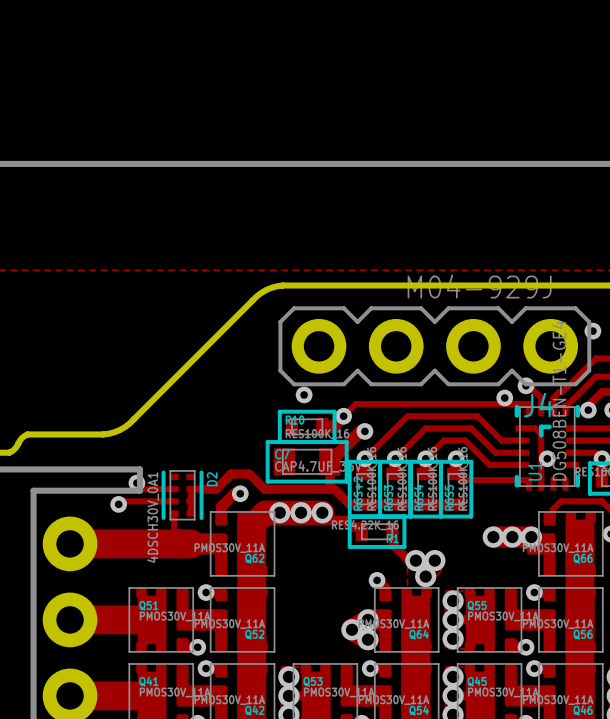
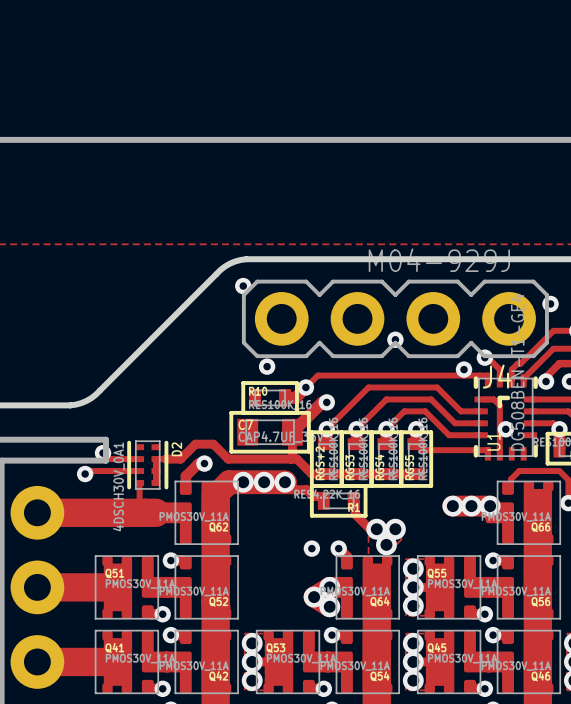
via: none -> (243, 286)
via: none -> (395, 339)
via: none -> (311, 548)

